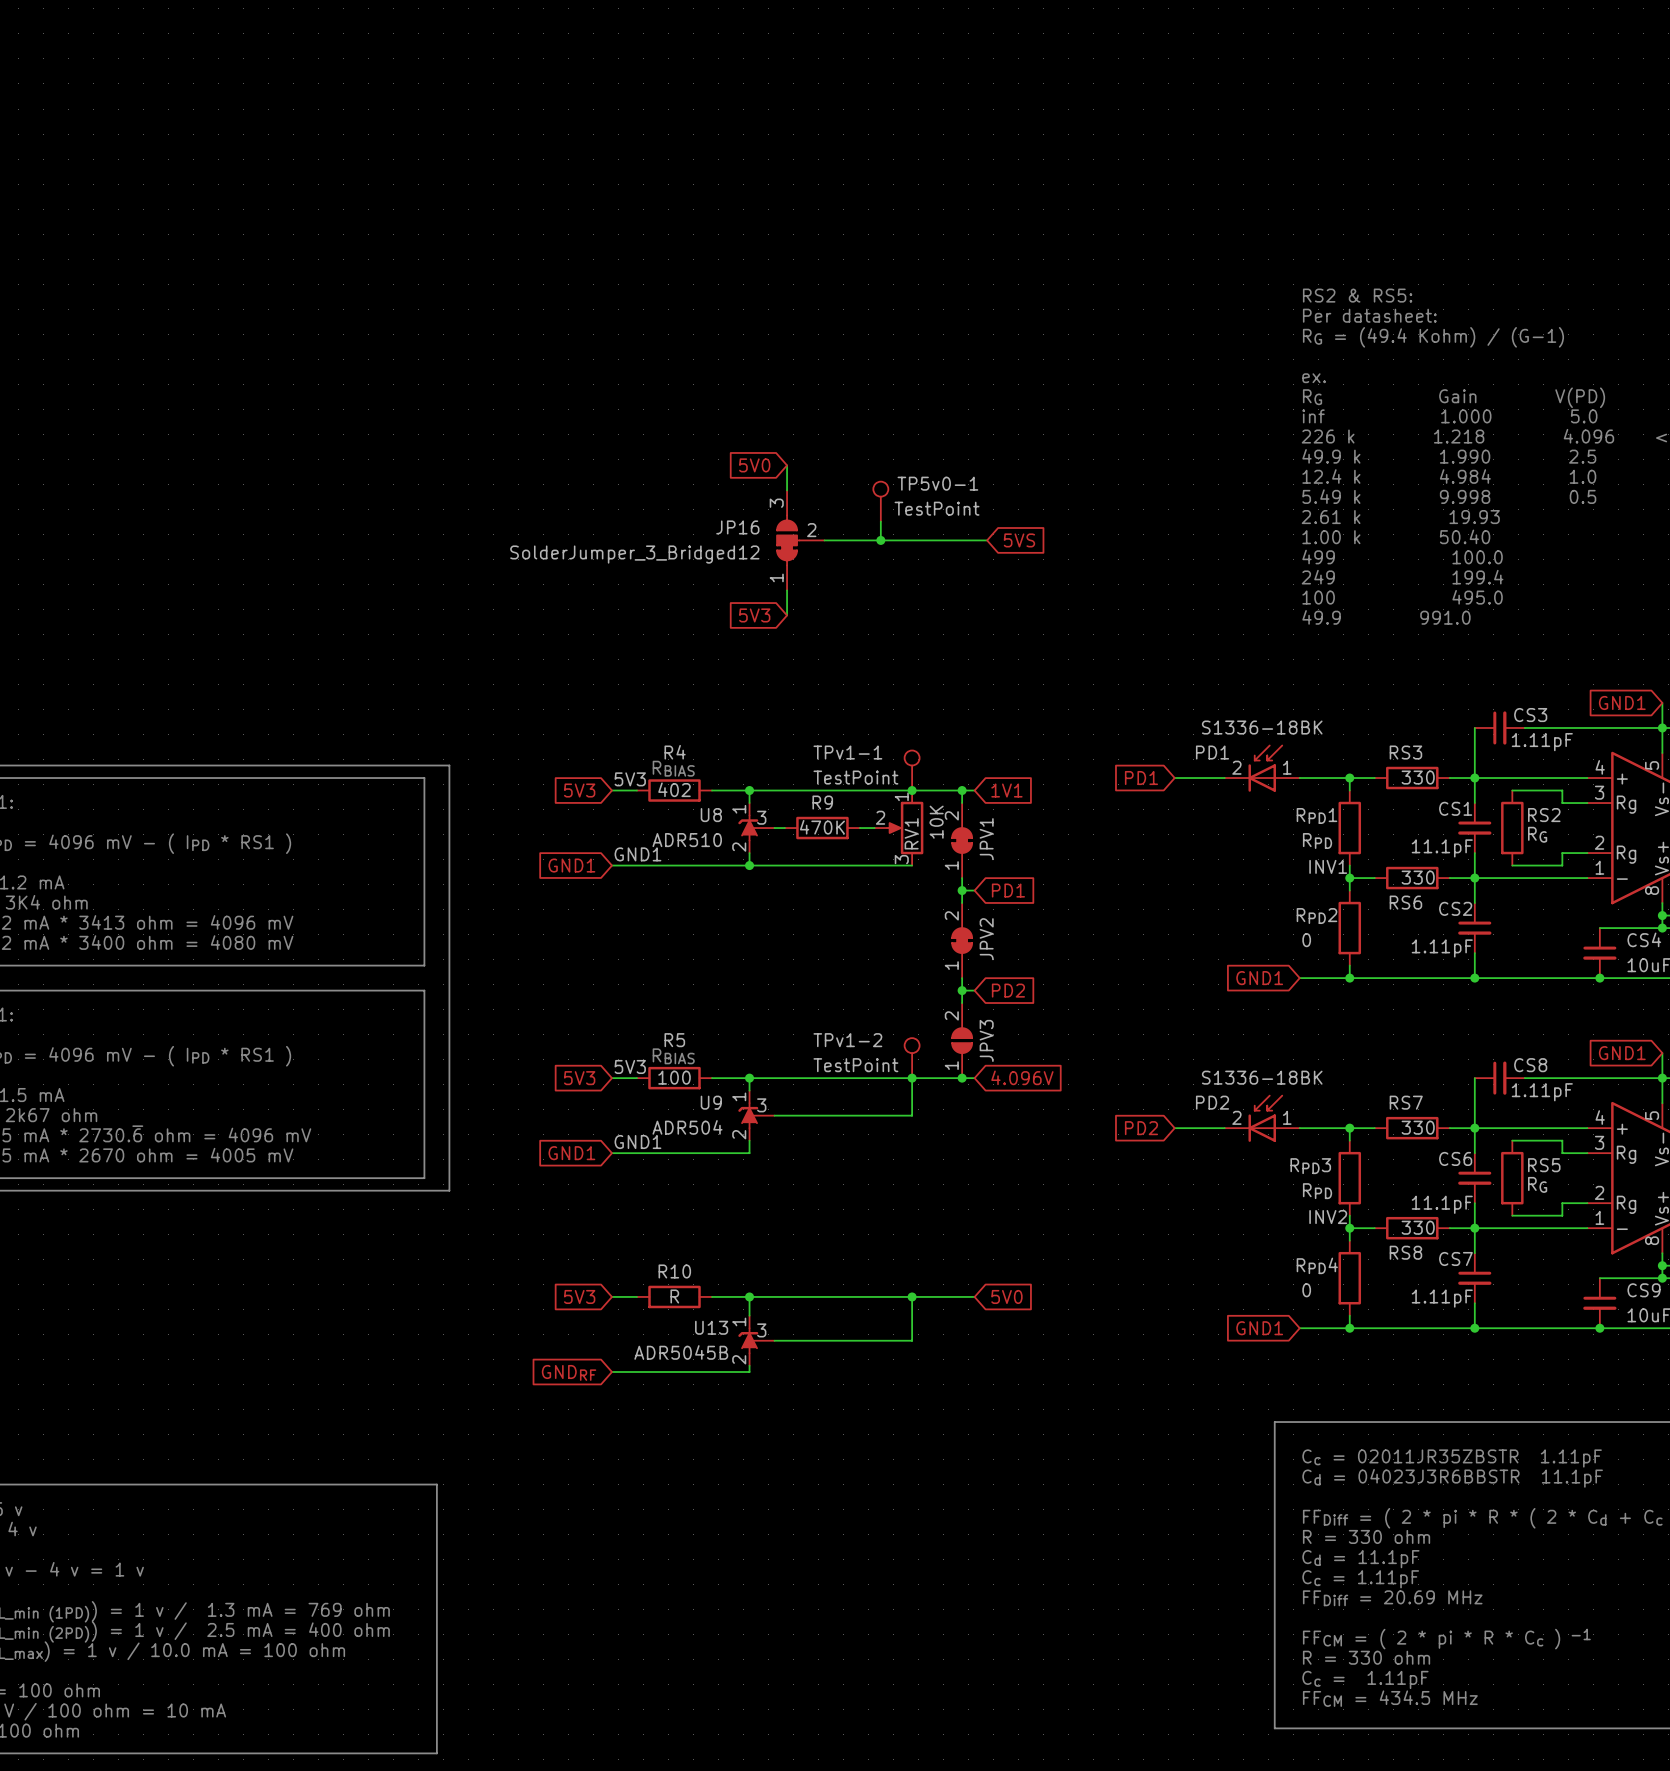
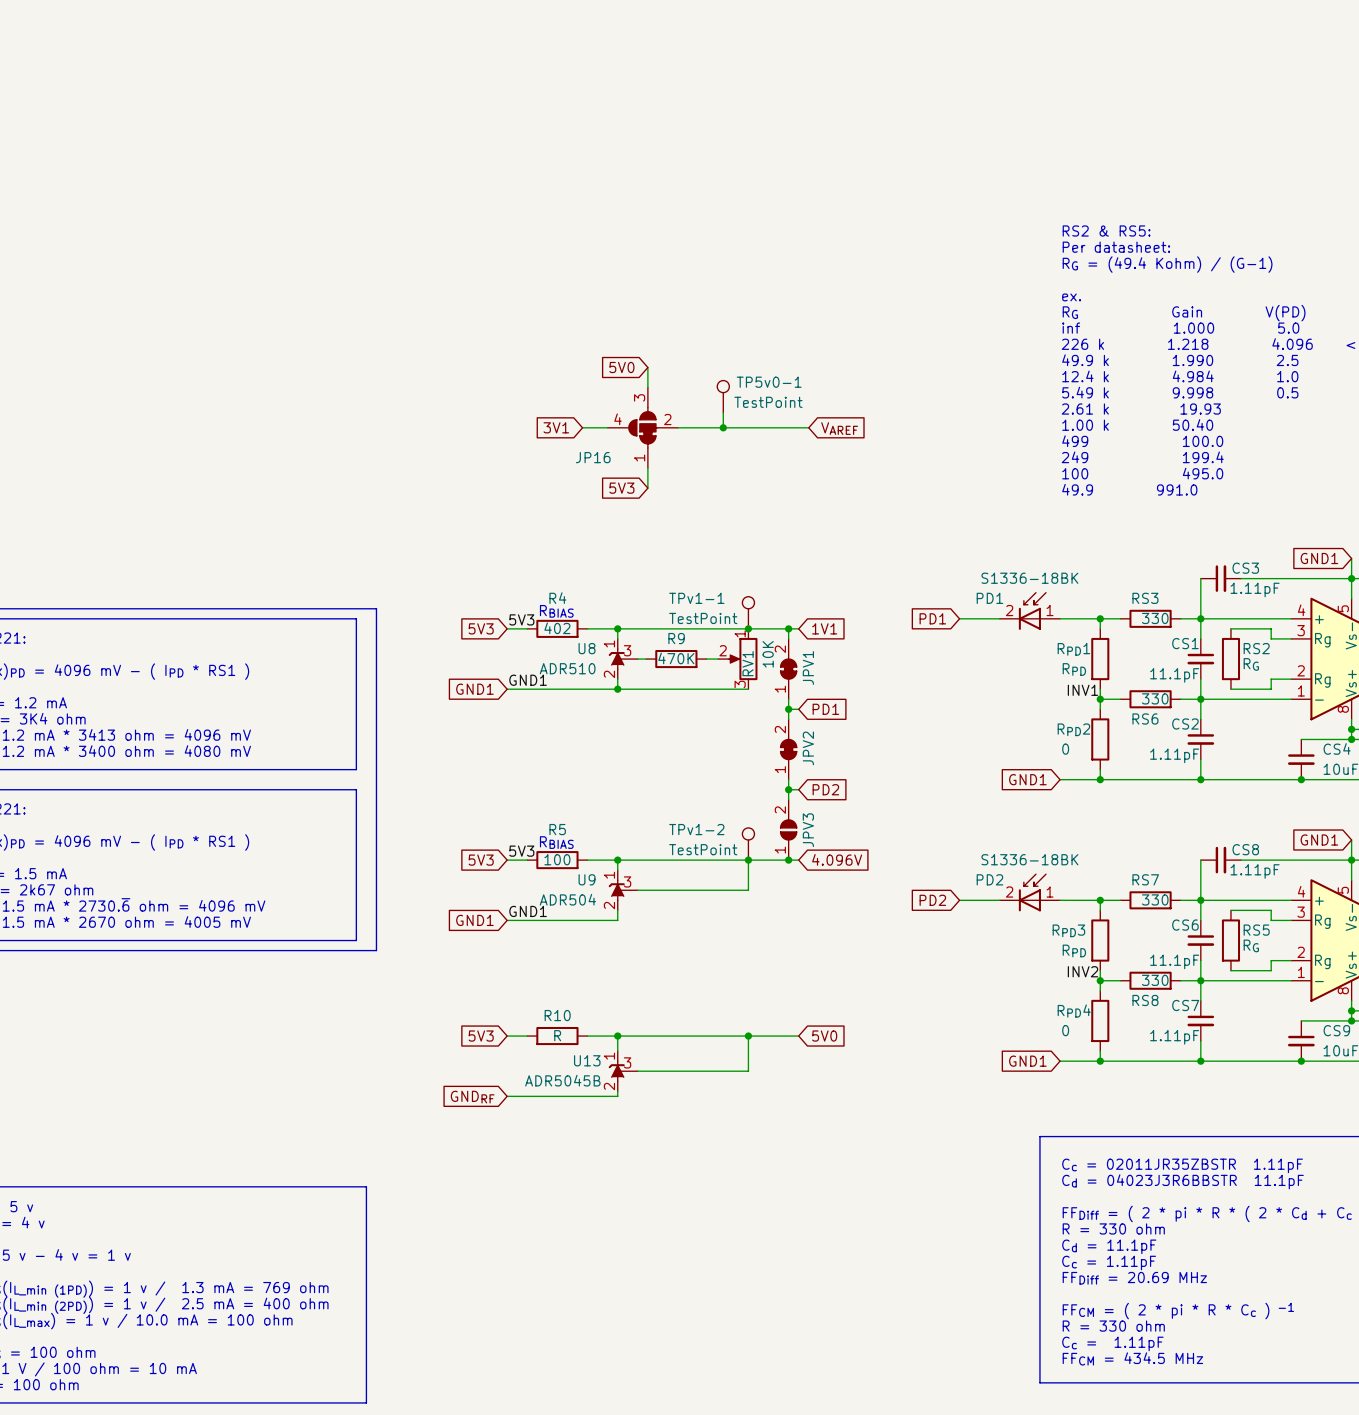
JP16 symbol: [777, 490, 825, 591] -> [607, 387, 679, 469]
JP16 name position: JP16 (737, 527) -> JP16 (593, 457)
global label: none -> 3V1 (556, 427)
wire: none -> (582, 427) (607, 427)
global label: 5VS (1019, 540) -> VAREF (839, 428)
JP16 value: SolderJumper_3_Bridged12 (634, 554) -> none

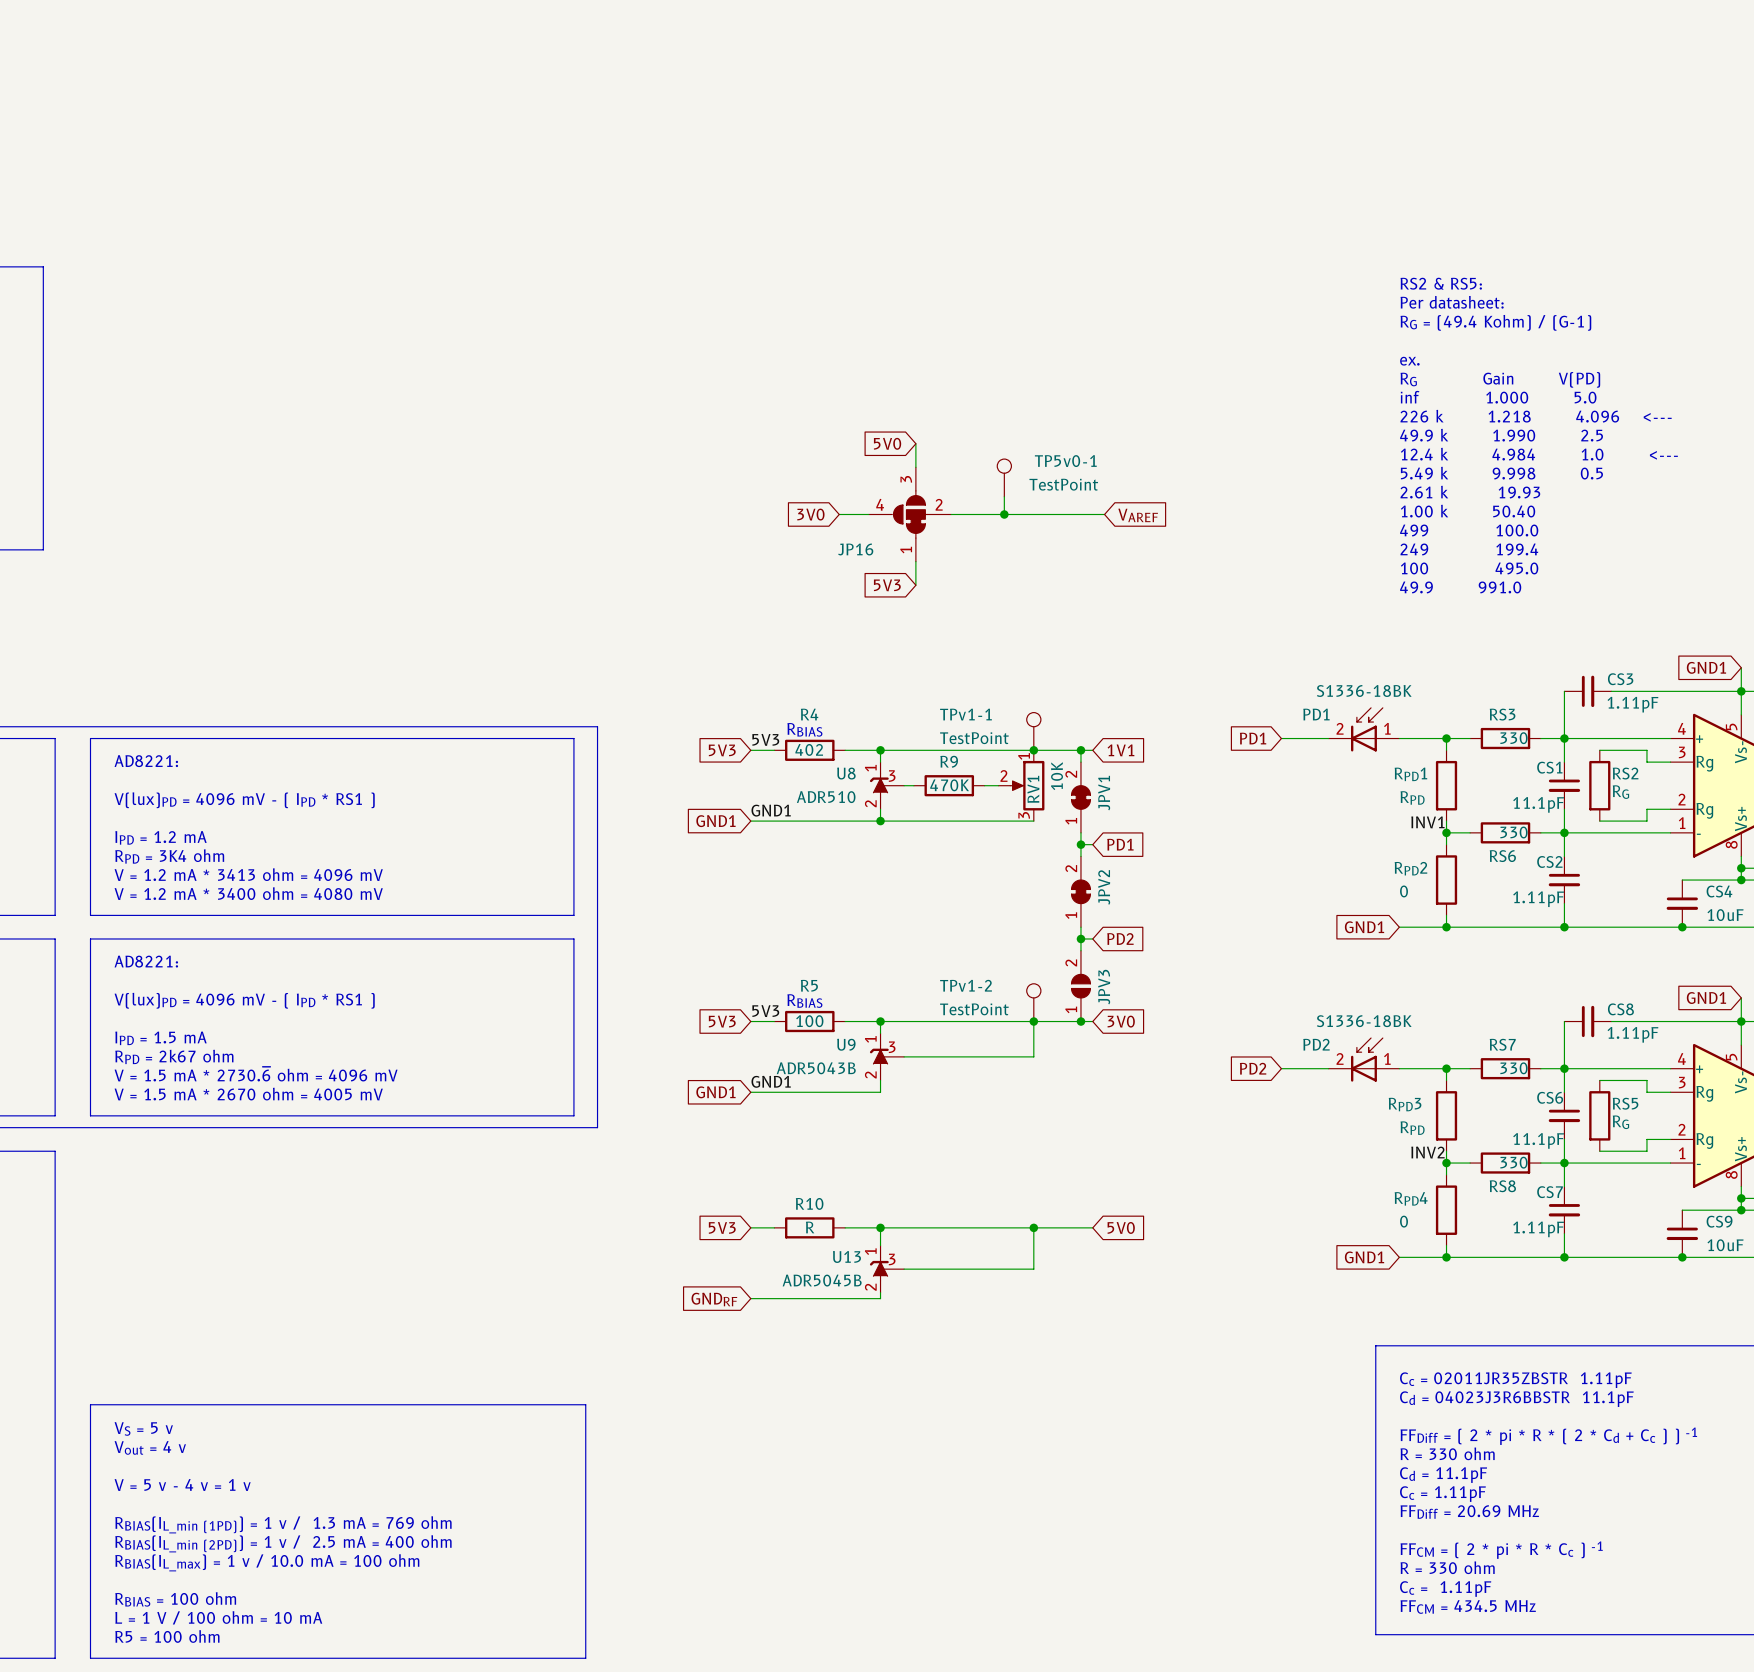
global label: 3V1 (556, 427) -> 3V0 (810, 514)
global label: 4.096V (837, 859) -> 3V0 (1121, 1021)
U9 value: ADR504 (567, 899) -> ADR5043B (816, 1068)

